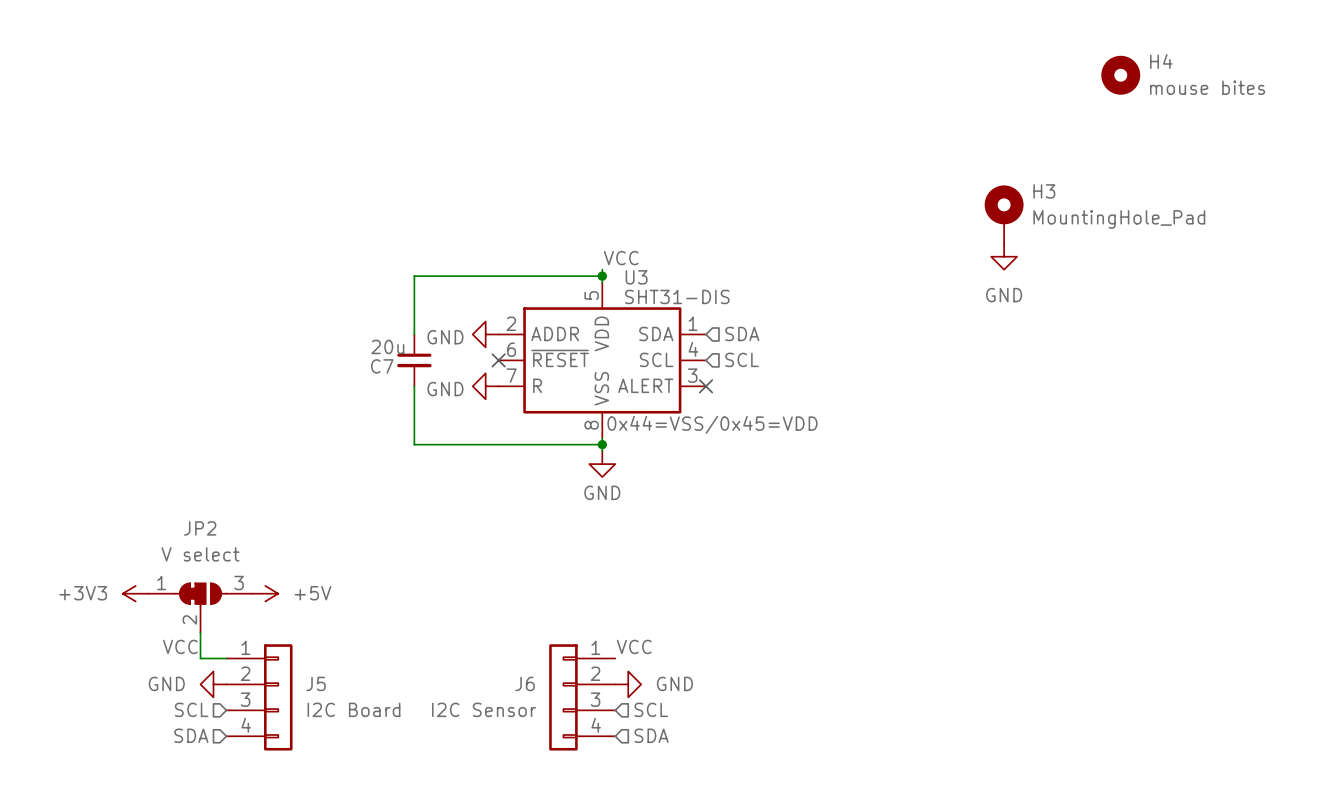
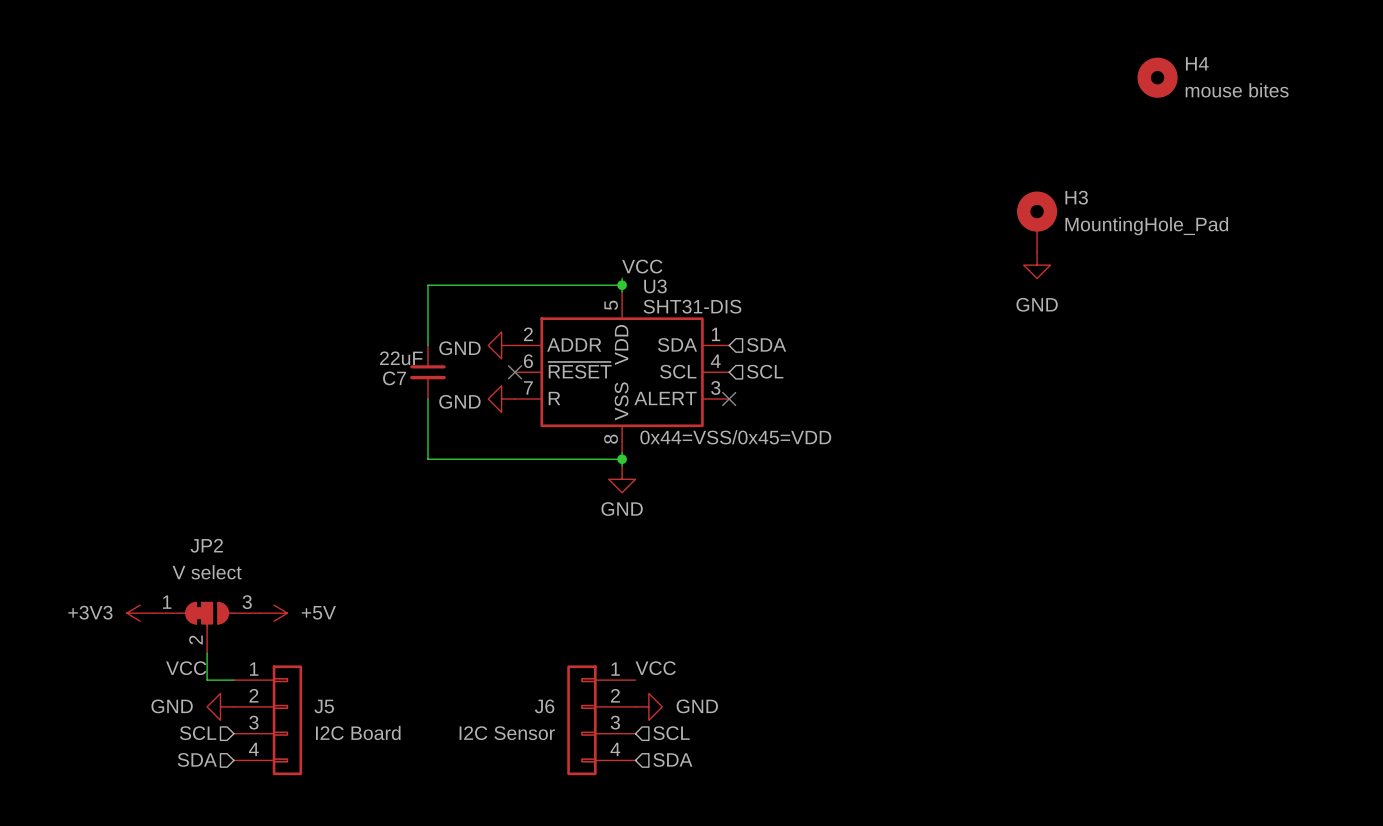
C7 value: 20u (387, 346) -> 22uF (401, 358)

